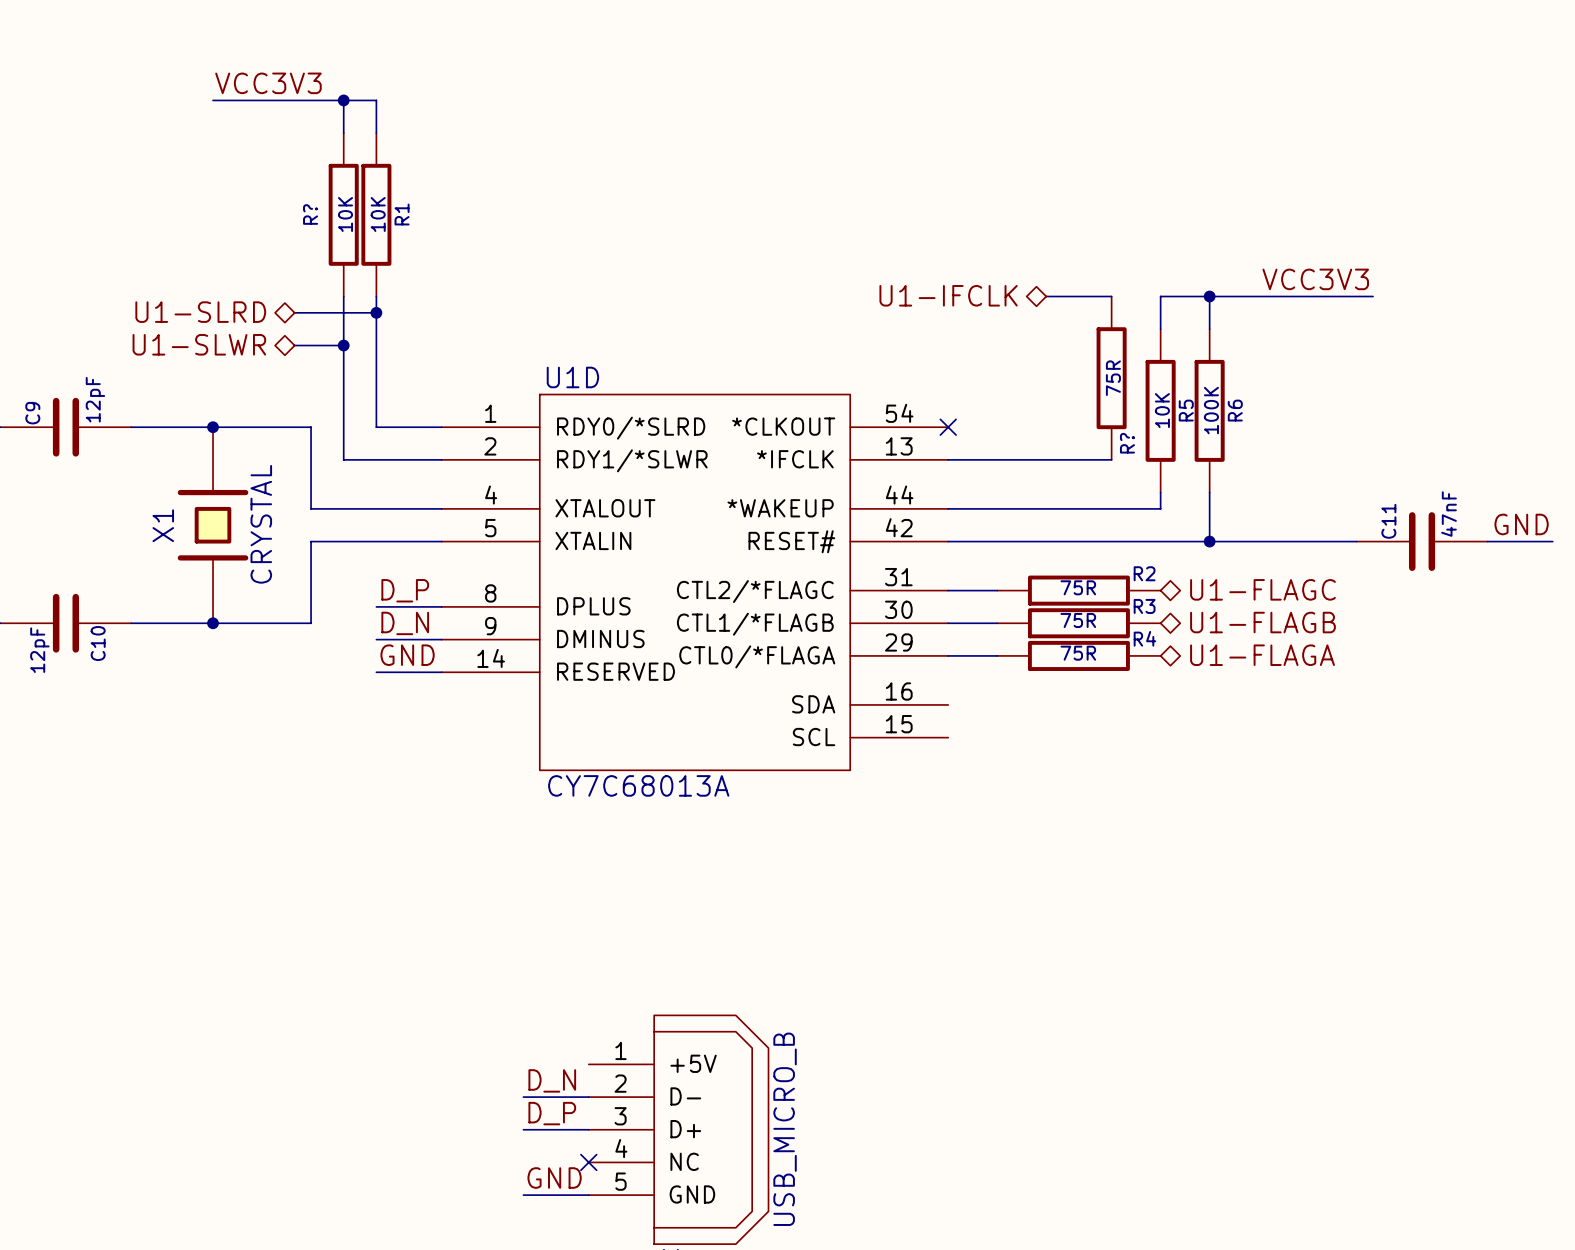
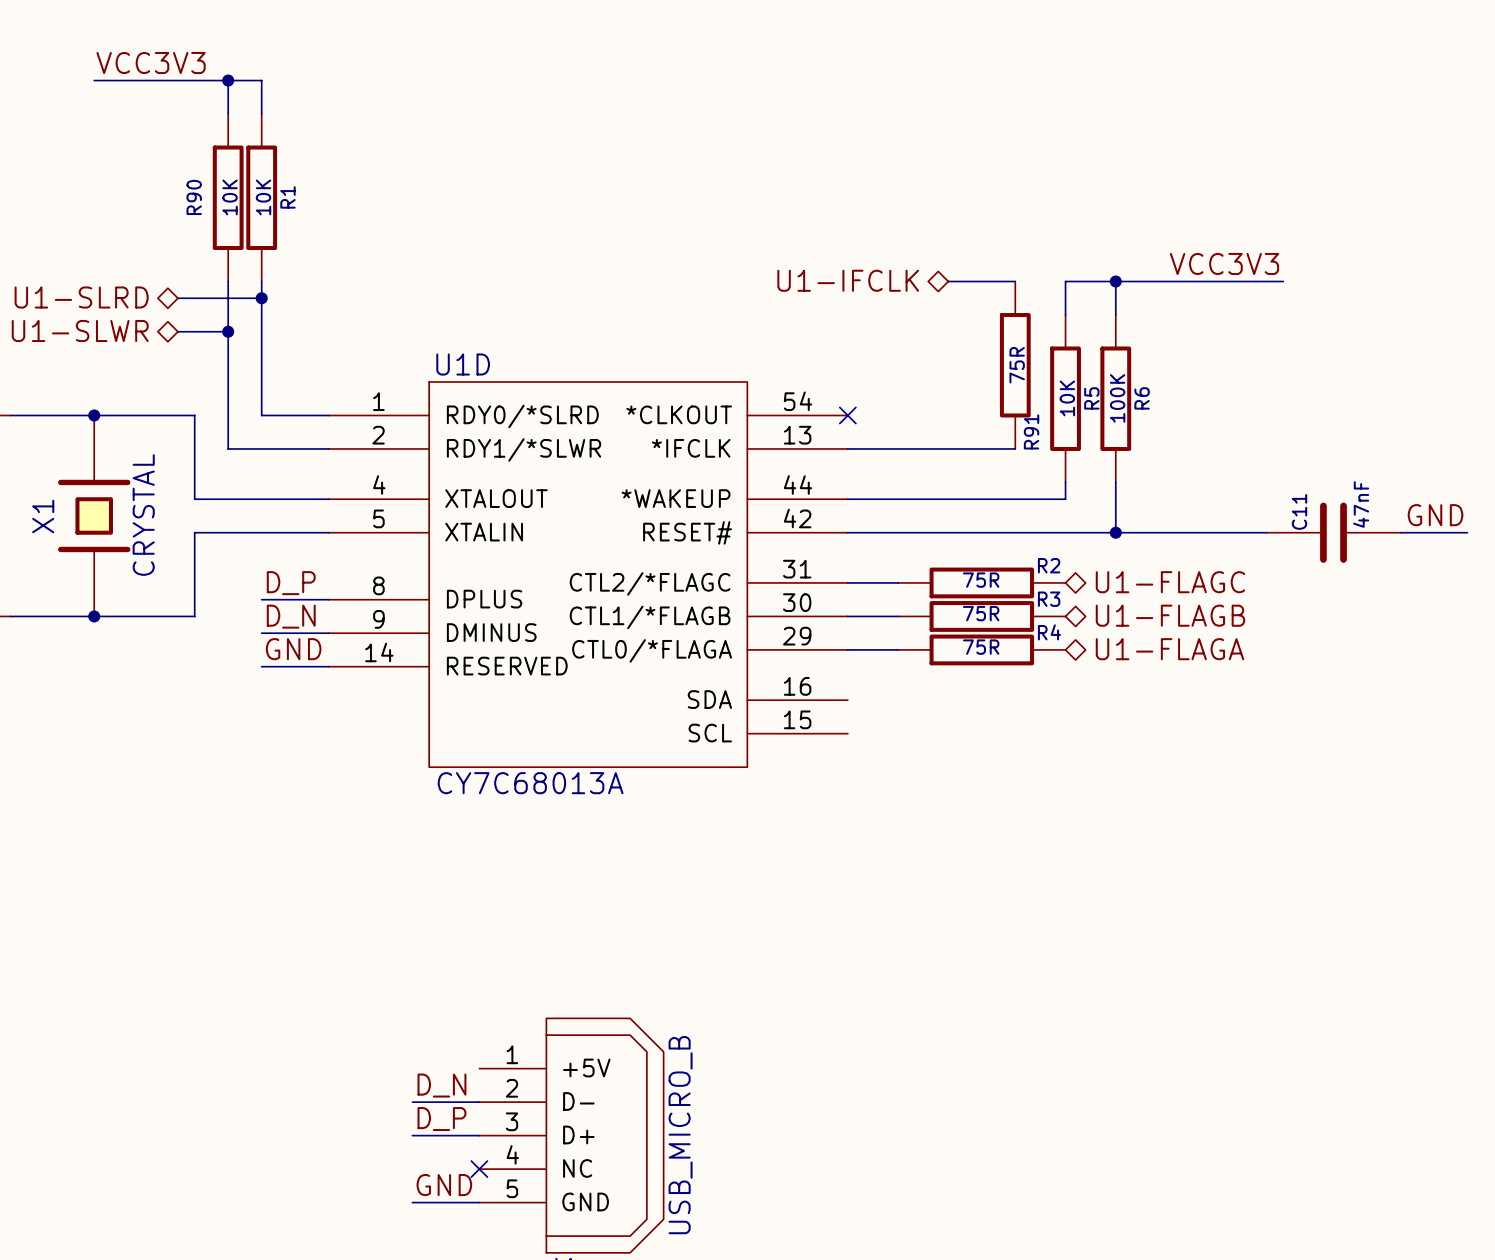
R? name: R? (310, 214) -> R90 (194, 197)
R? name: R? (1127, 443) -> R91 (1031, 431)

